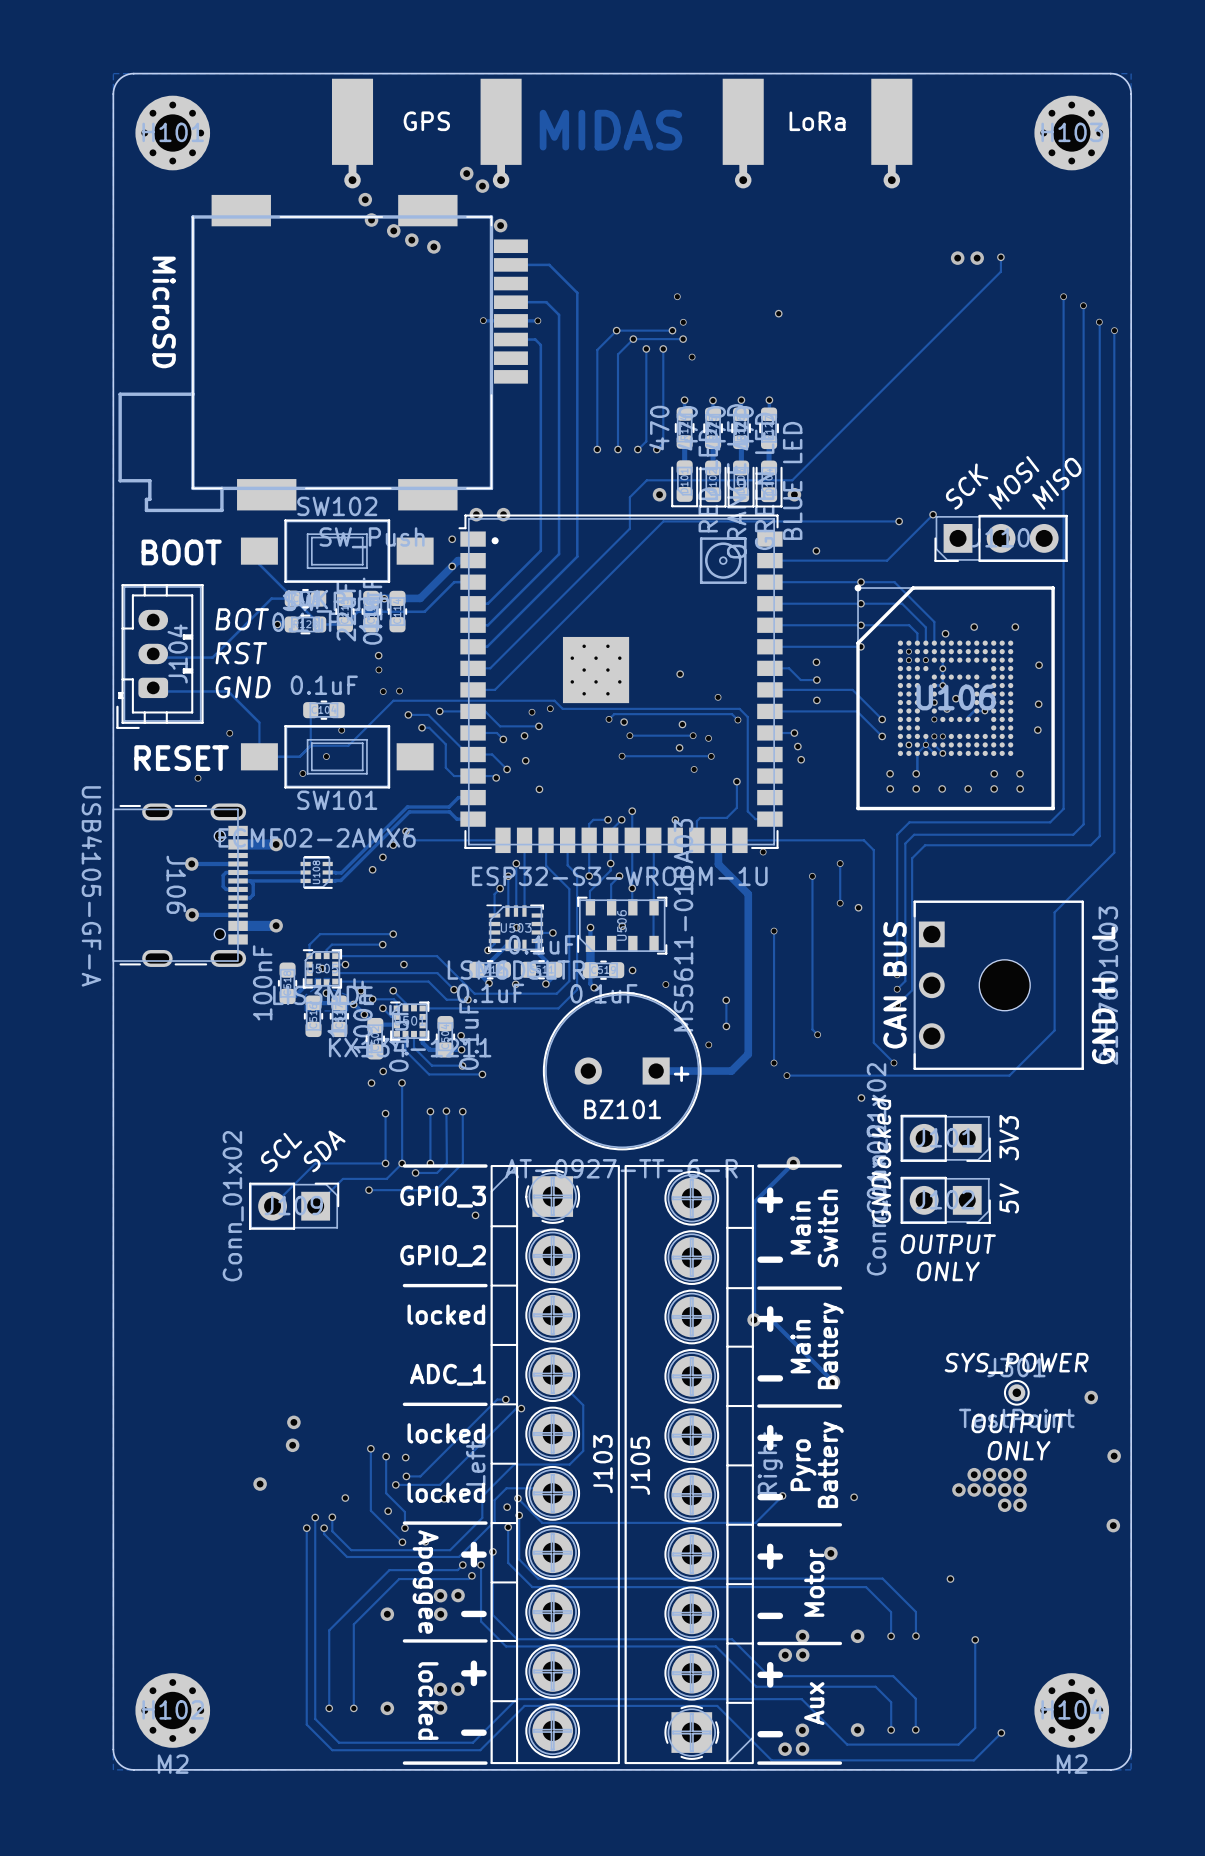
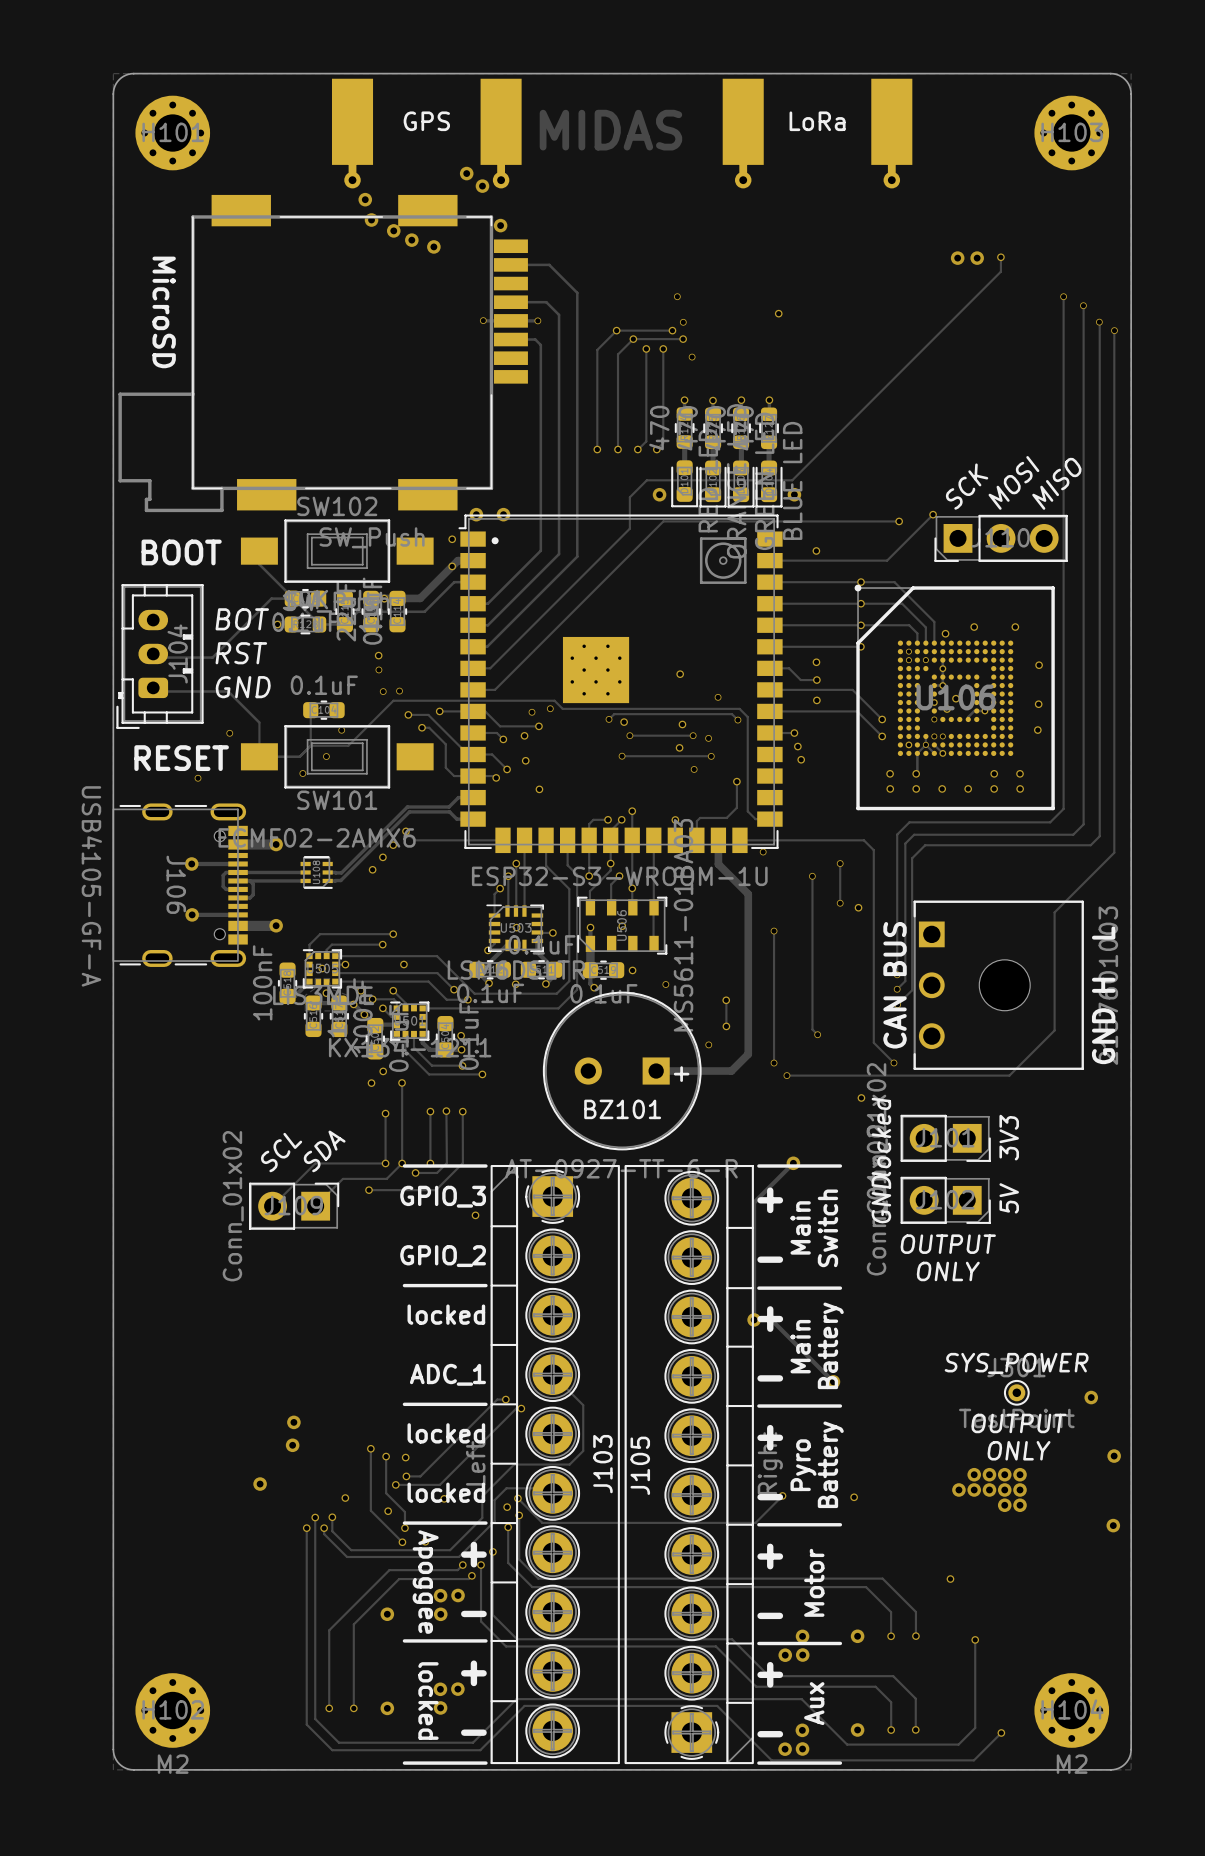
via: (830, 1553) -> none

